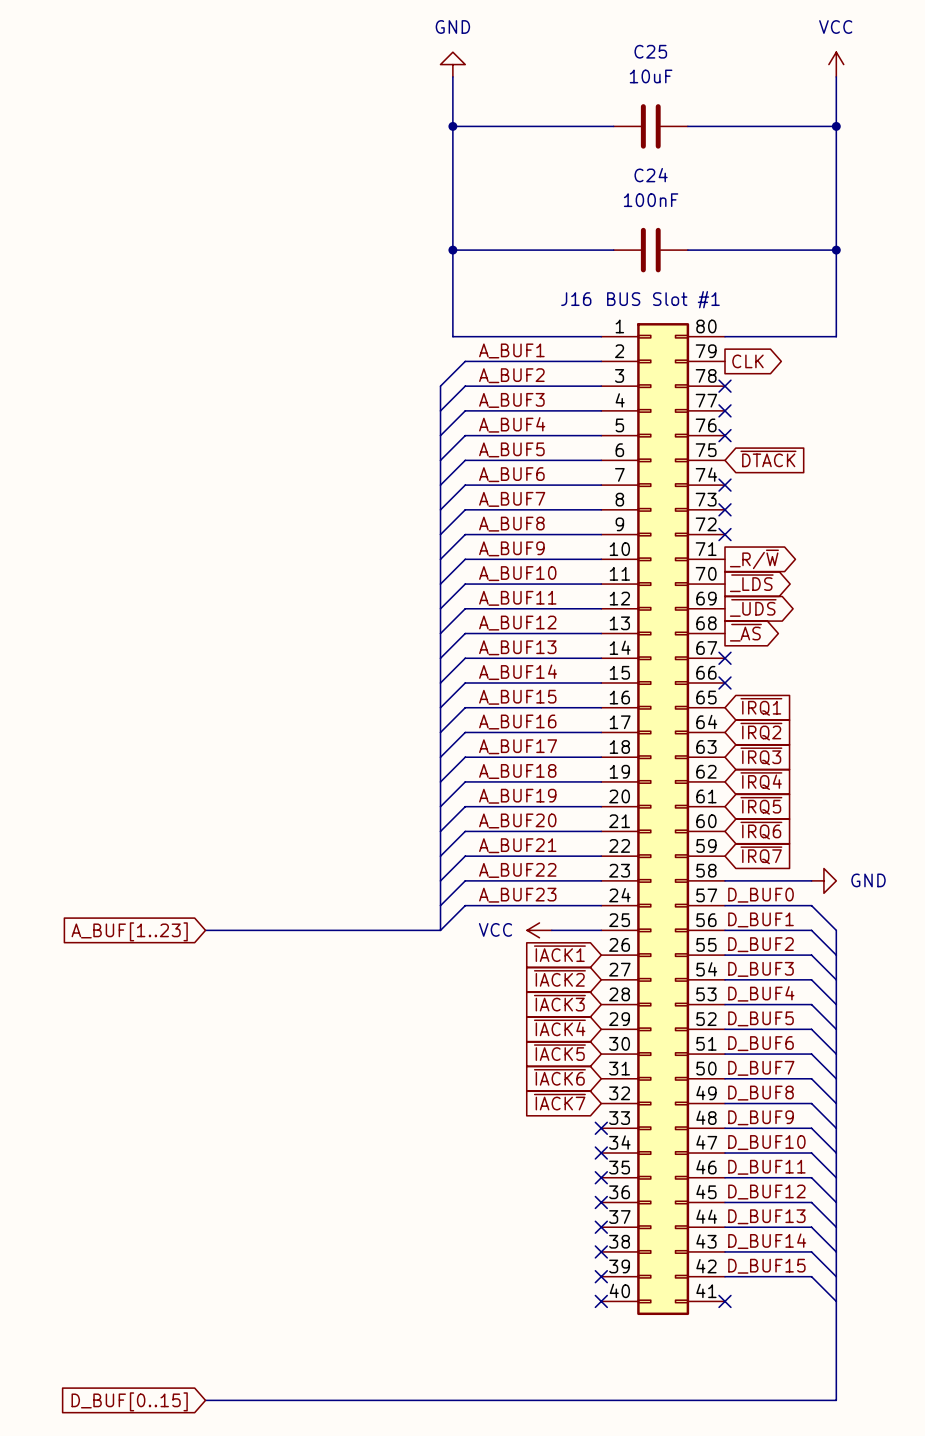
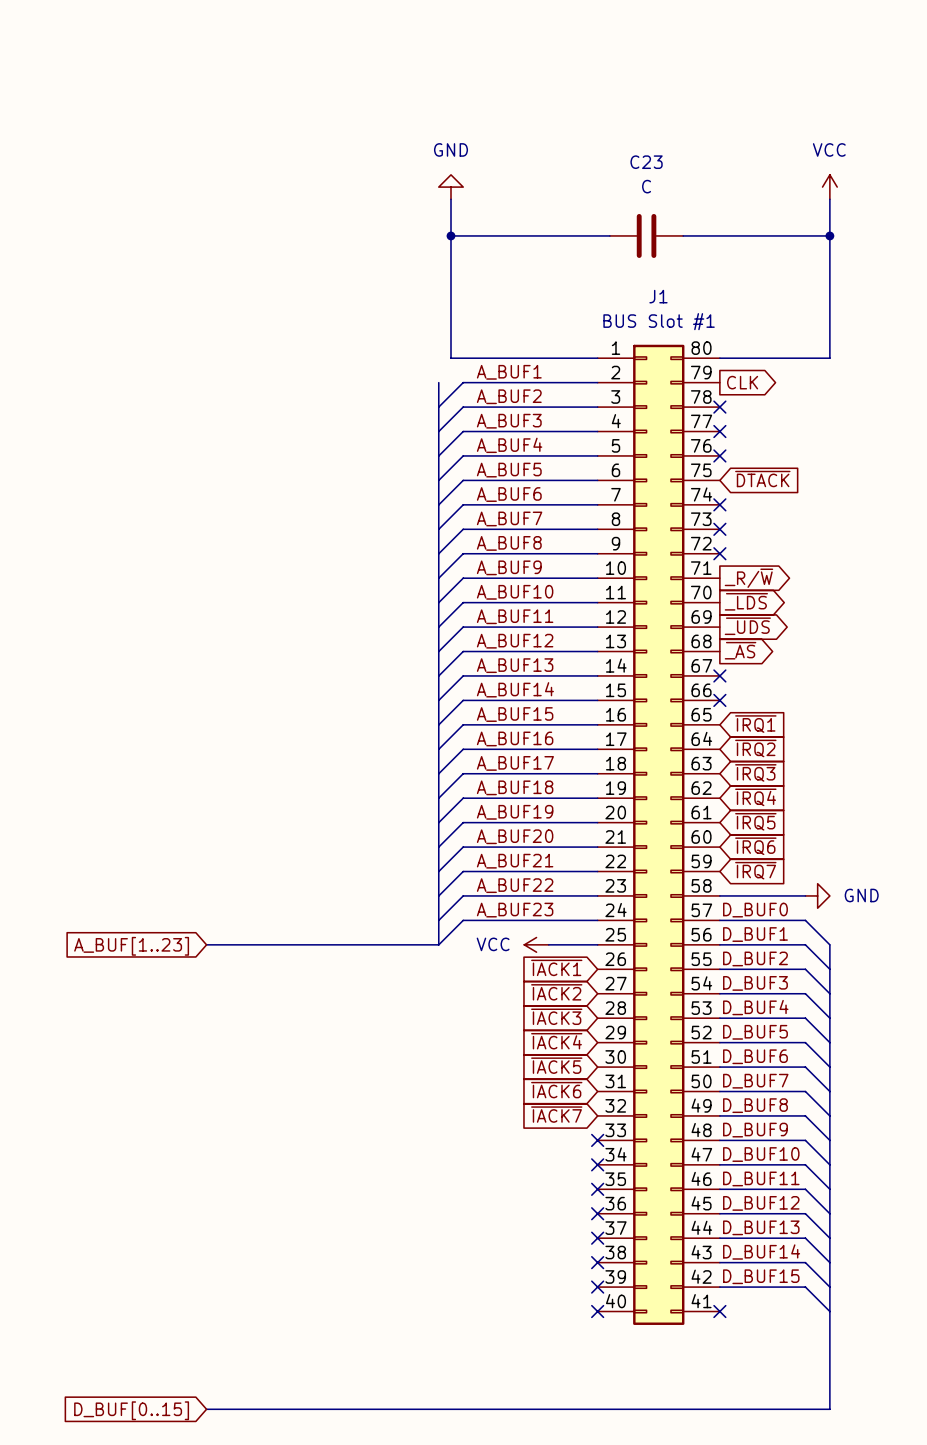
power symbol position: GND (452, 64) -> GND (451, 187)
power symbol position: VCC (836, 64) -> VCC (829, 187)
wire: (452, 76) (452, 175) -> none
wire: (836, 76) (836, 175) -> none
wire: (452, 126) (613, 126) -> none
junction: (452, 126) -> none
C25: 10uF (650, 126) -> none
wire: (687, 126) (836, 126) -> none
junction: (836, 126) -> none
C23: none -> C (646, 235)
wire: (452, 250) (613, 250) -> (451, 235) (609, 235)
junction position: (452, 250) -> (451, 235)
C24: 100nF (650, 250) -> none
wire: (687, 250) (836, 250) -> (683, 235) (829, 235)
junction position: (836, 250) -> (829, 235)
J16 name: J16 (576, 299) -> J1 (658, 296)
bus: none -> (438, 382) (438, 407)

